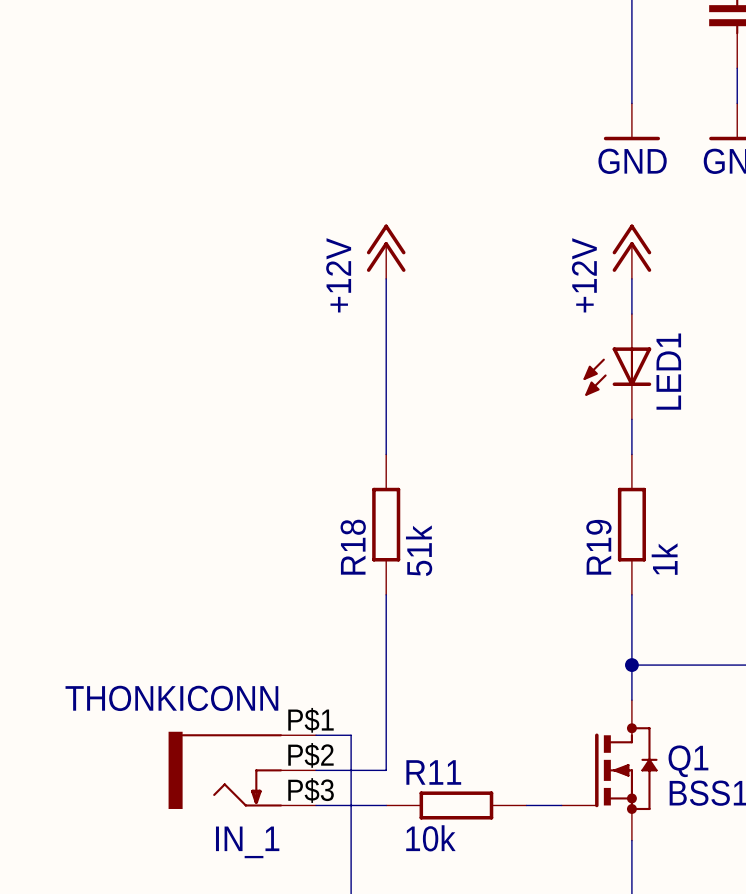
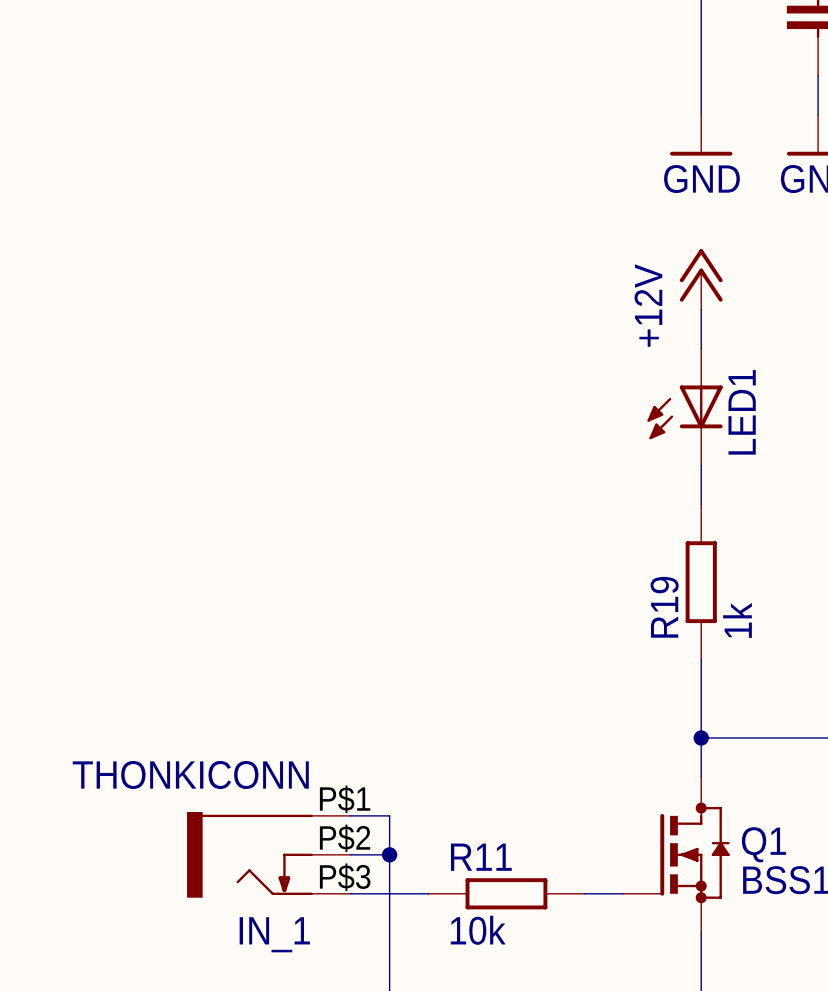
power symbol: +12V (386, 251) -> none
wire: (386, 278) (386, 454) -> none
R18: 51k (386, 524) -> none
wire: (386, 594) (386, 770) (351, 770) -> none
junction: none -> (389, 854)

